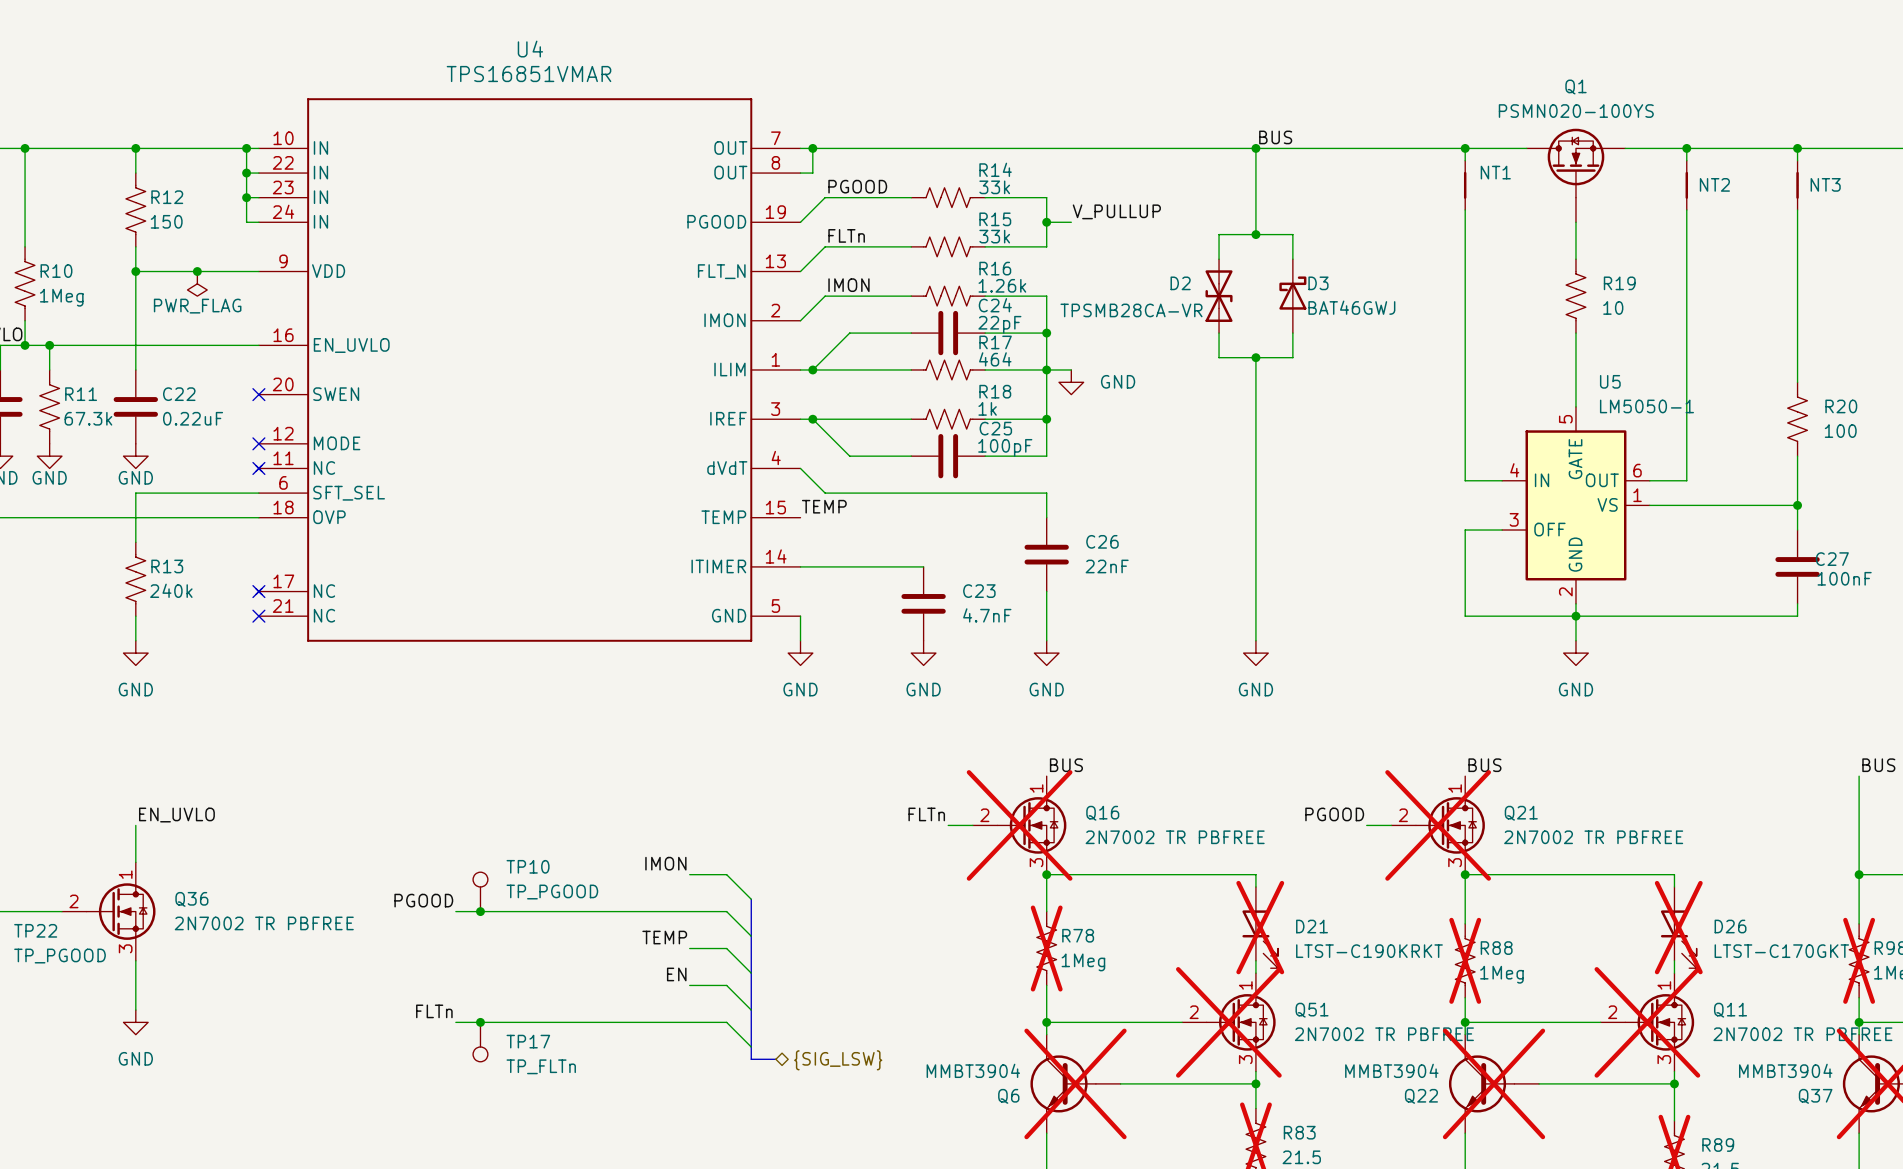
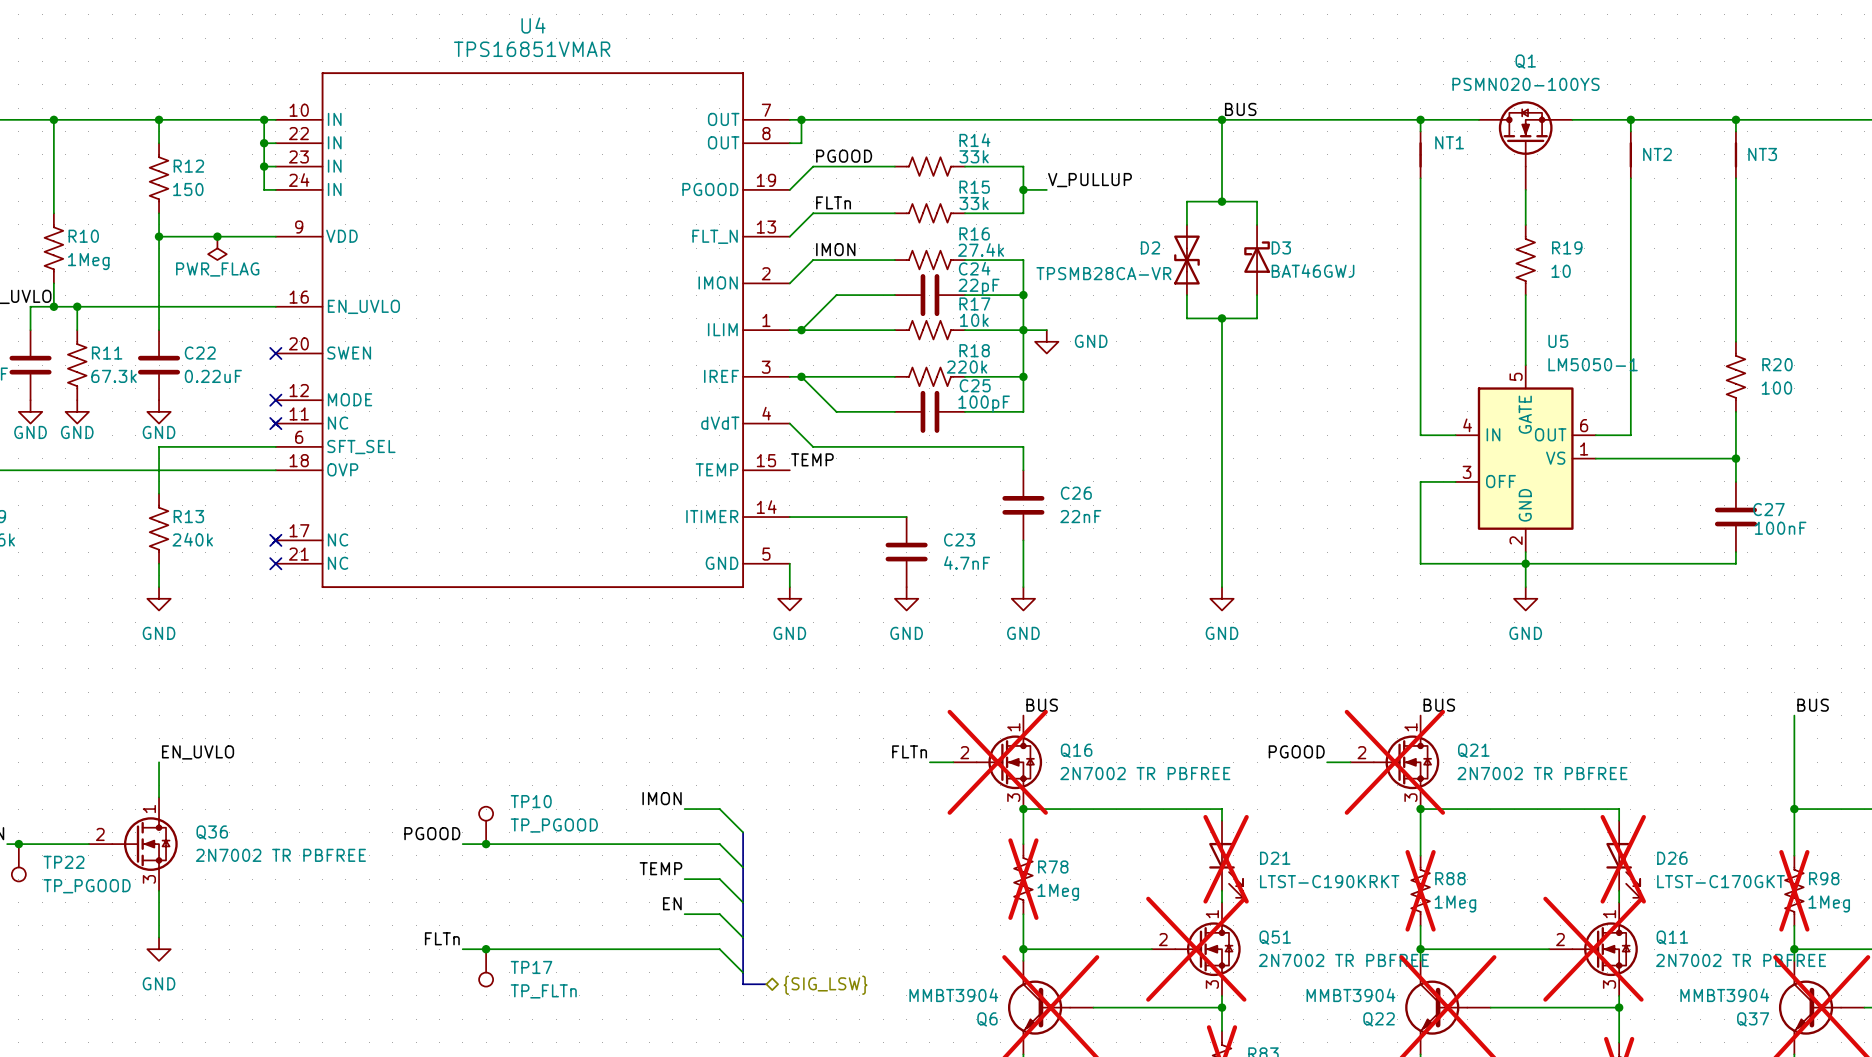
R16 value: 1.26k (1002, 285) -> 27.4k (981, 249)
R17 value: 464 (995, 359) -> 10k (974, 320)
R18 value: 1k (987, 408) -> 220k (967, 367)

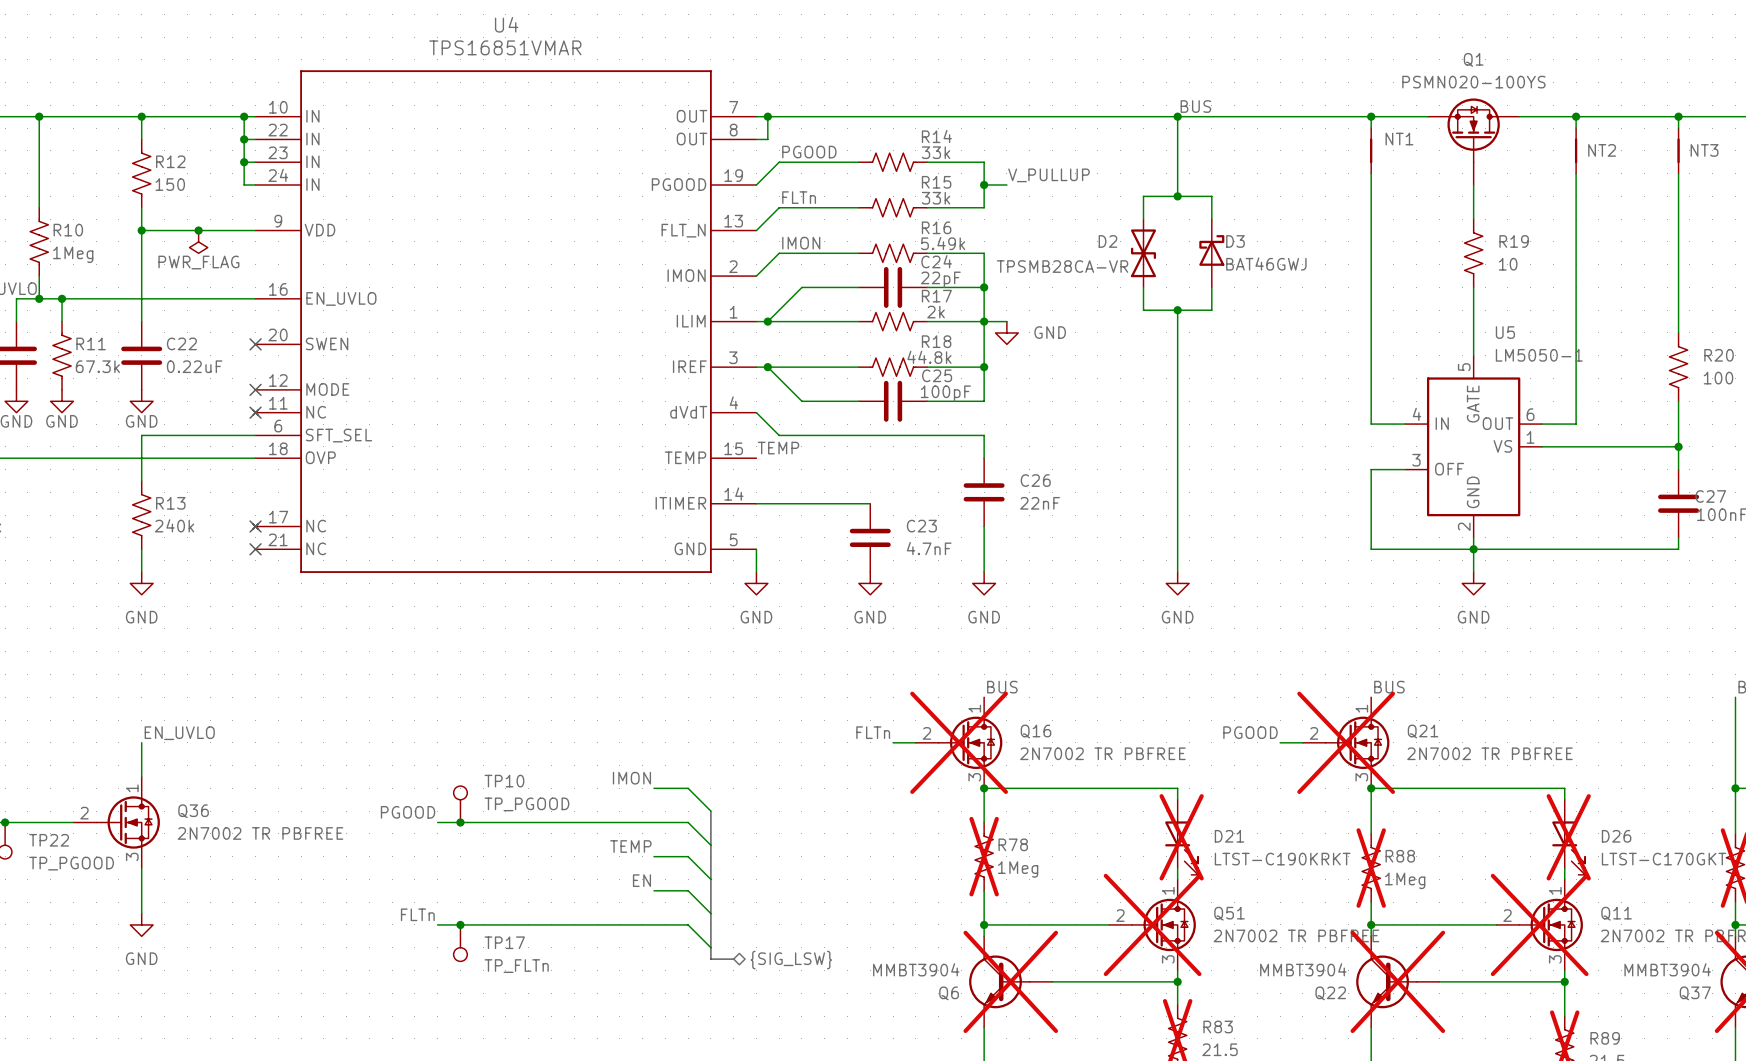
Q1 flip: as is (1525, 133) -> left-right (1473, 130)
R16 value: 27.4k (981, 249) -> 5.49k (943, 243)
R17 value: 10k (974, 320) -> 2k (936, 312)
R18 value: 220k (967, 367) -> 44.8k (929, 357)

